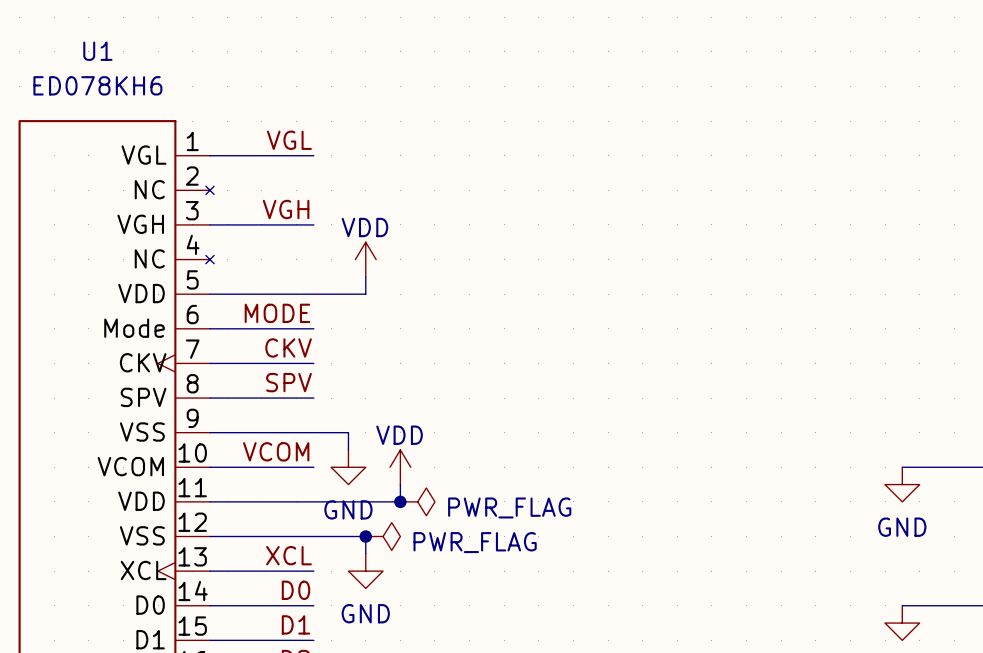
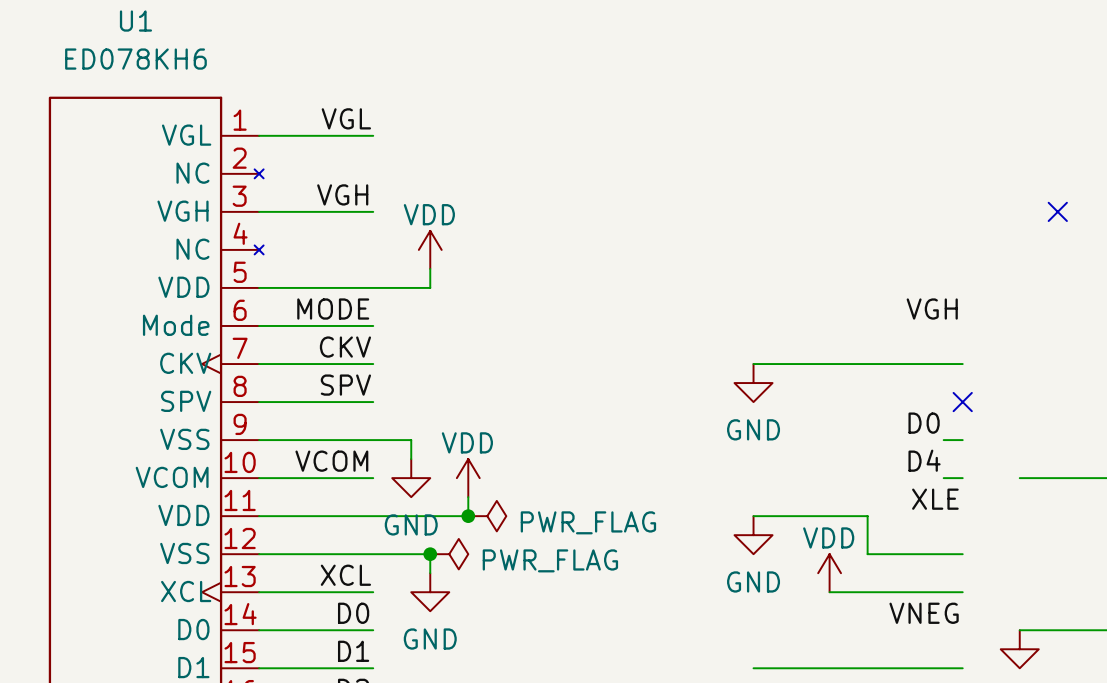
no-connect mark: none -> (1057, 211)
label: none -> VGH (932, 309)
wire: none -> (753, 364) (962, 364)
power symbol: none -> GND (753, 383)
no-connect mark: none -> (962, 402)
label: none -> D0 (924, 423)
wire: none -> (943, 440) (962, 440)
label: none -> D4 (924, 460)
wire: none -> (943, 478) (962, 478)
power symbol: GND (902, 484) -> none
label: none -> XLE (935, 499)
wire: none -> (753, 516) (867, 516) (867, 554) (962, 554)
power symbol: none -> GND (753, 535)
power symbol: none -> VDD (829, 573)
wire: none -> (829, 592) (962, 592)
label: none -> VNEG (924, 613)
wire: none -> (753, 668) (962, 668)

